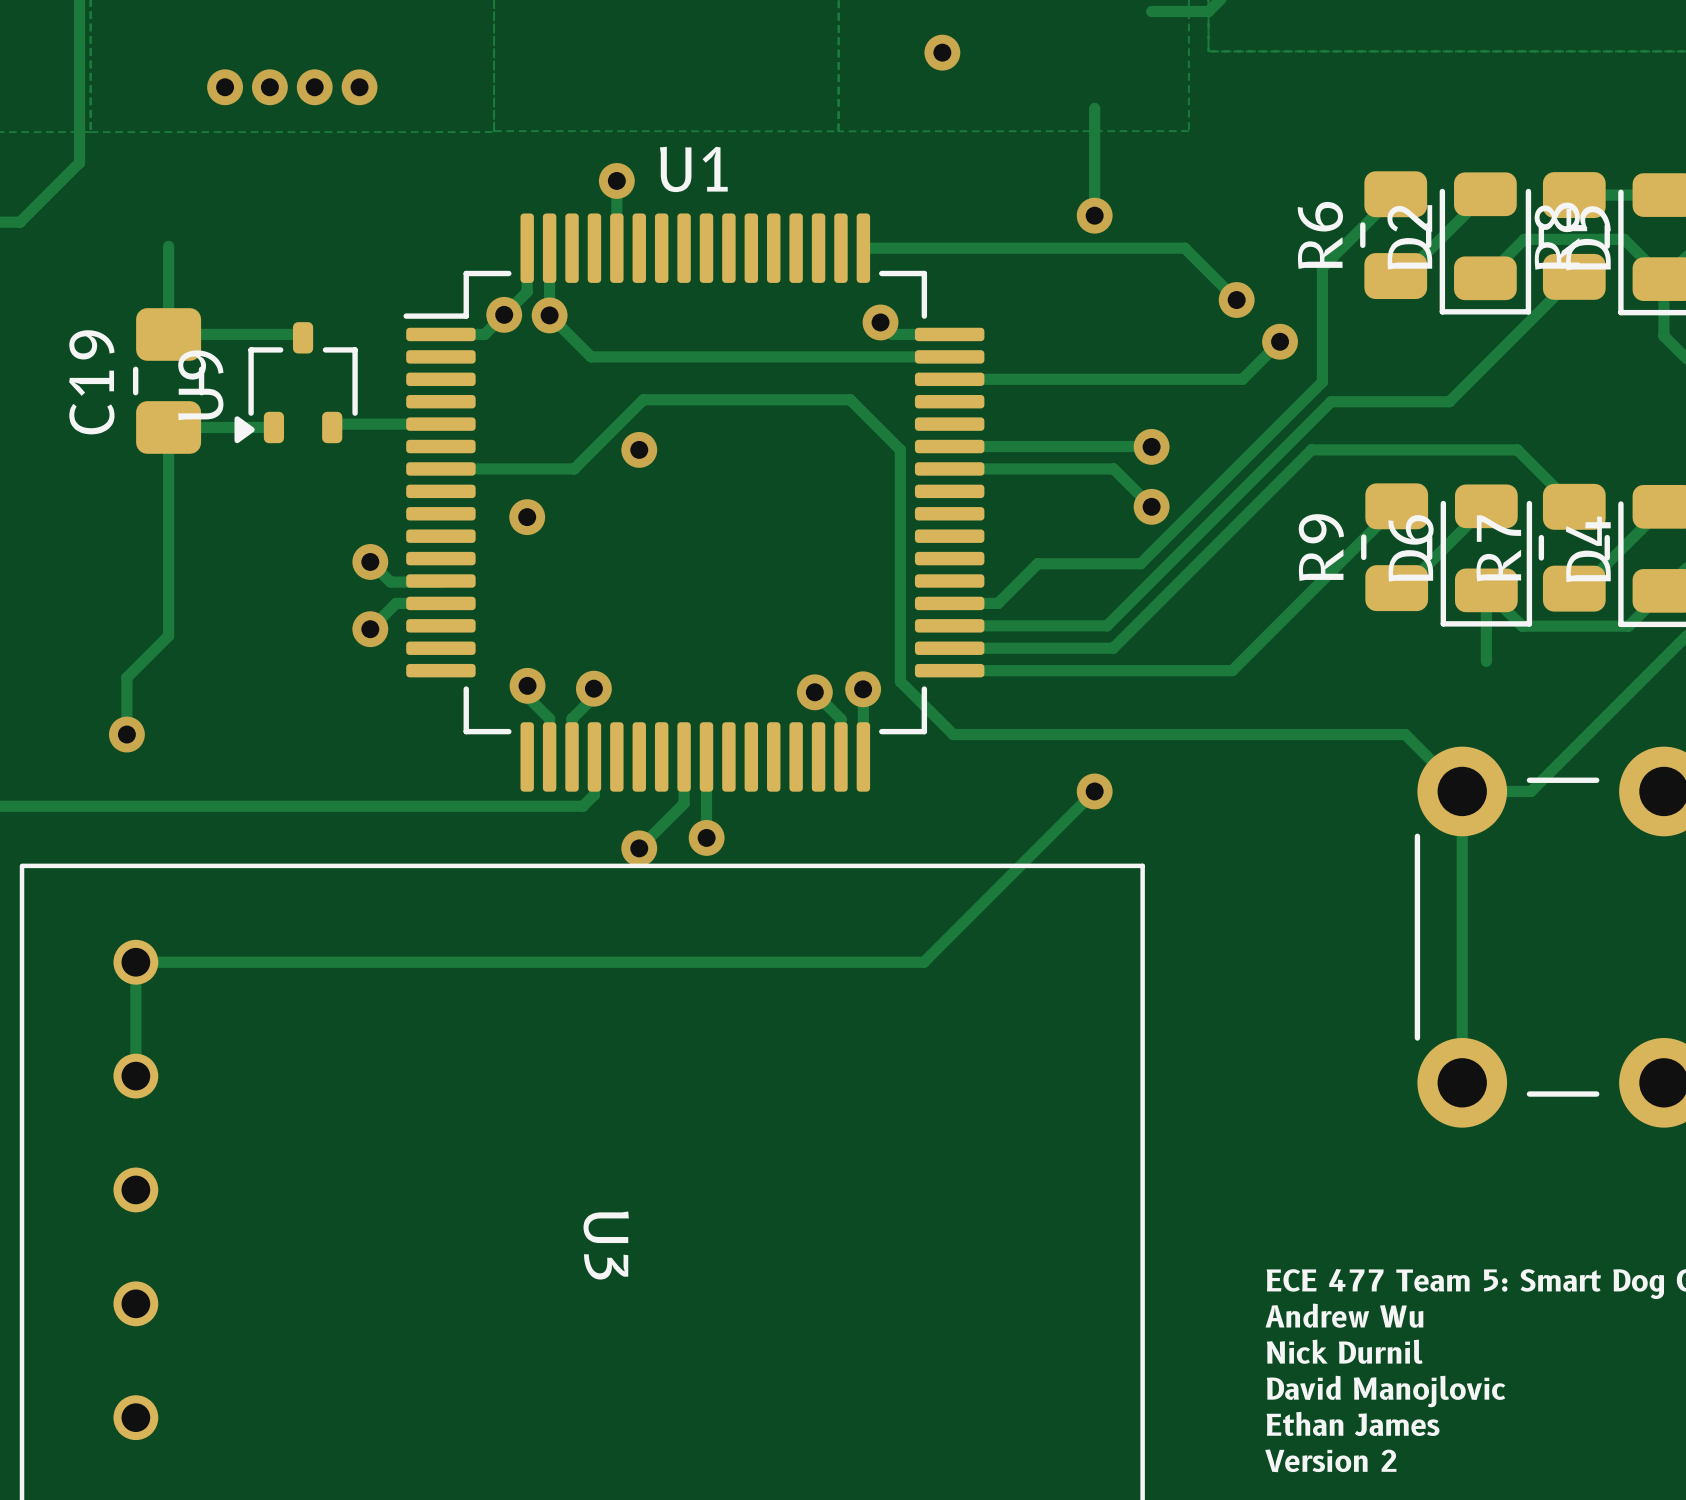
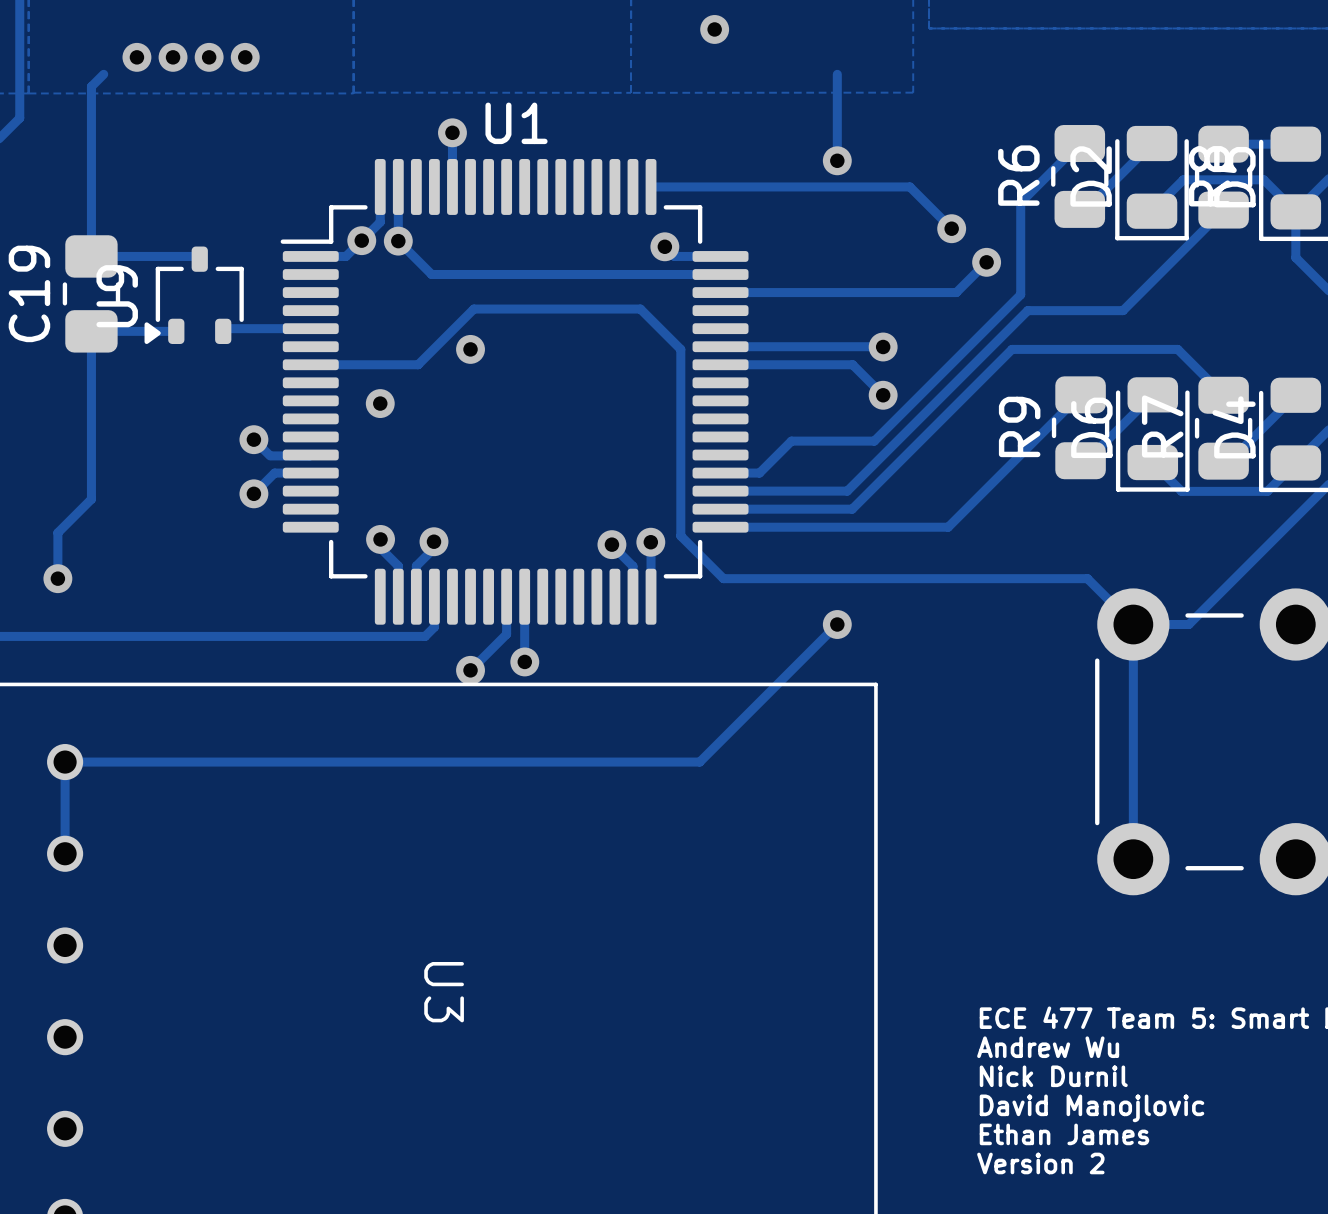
track: none -> (103, 74) (91, 86) (91, 185)
track: (1486, 590) (1486, 661) -> none

